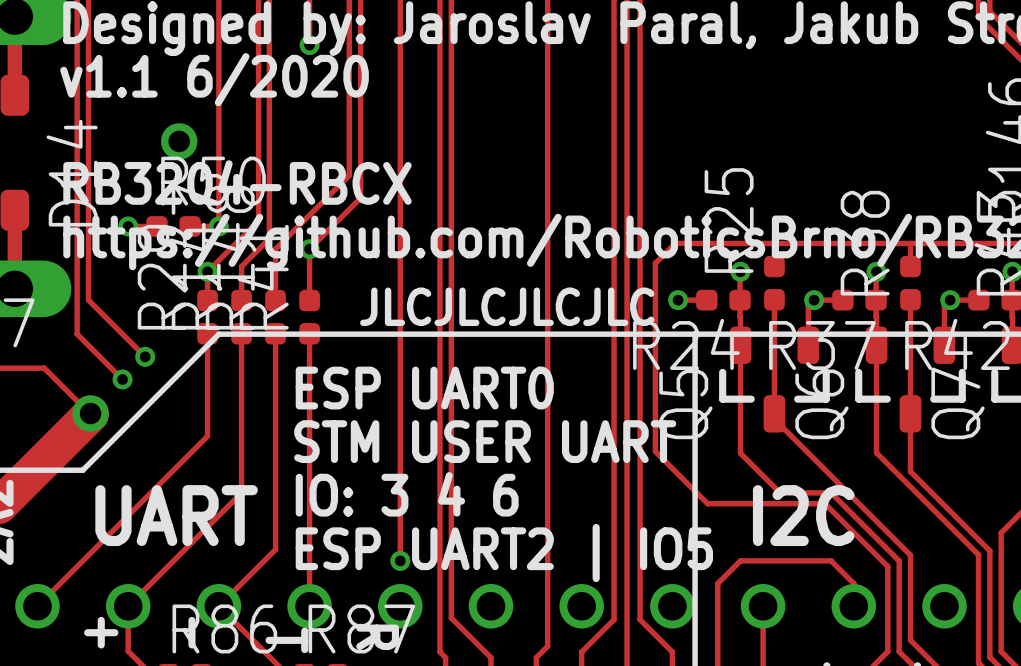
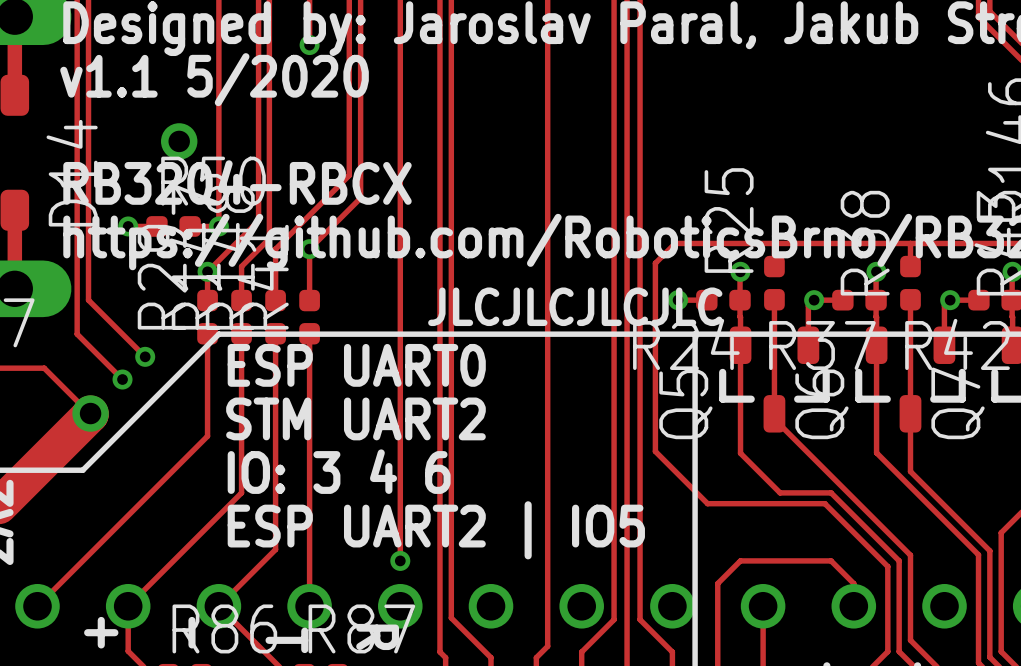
text: v1.1 6/2020 (214, 79) -> v1.1 5/2020 (214, 79)
text position: JLCJLCJLCJLC (507, 306) -> JLCJLCJLCJLC (575, 306)
text position: ESP UART0 (424, 388) -> ESP UART0 (356, 365)
text: STM USER UART (485, 441) -> STM UART2 (355, 418)
text position: IO: 3 4 6 (407, 494) -> IO: 3 4 6 (339, 471)
text: UART (176, 515) -> none
text: I2C (803, 515) -> none
text position: ESP UART2 | IO5 (504, 552) -> ESP UART2 | IO5 (436, 530)

